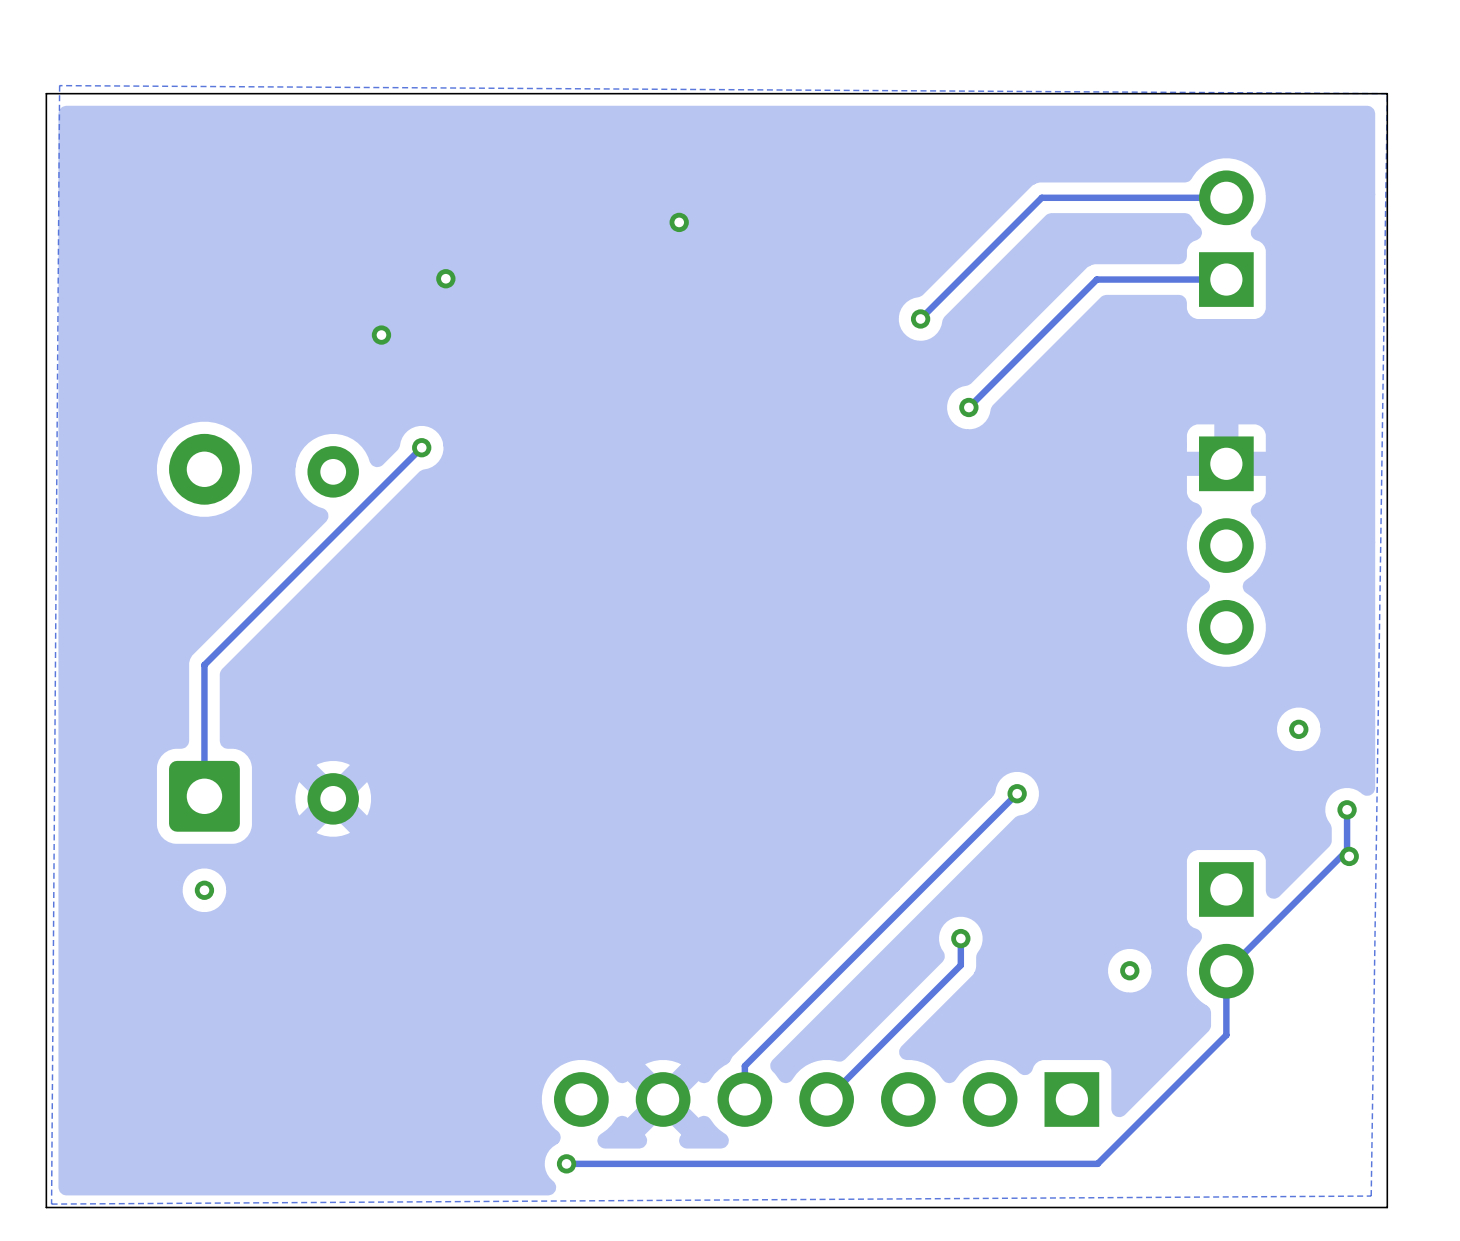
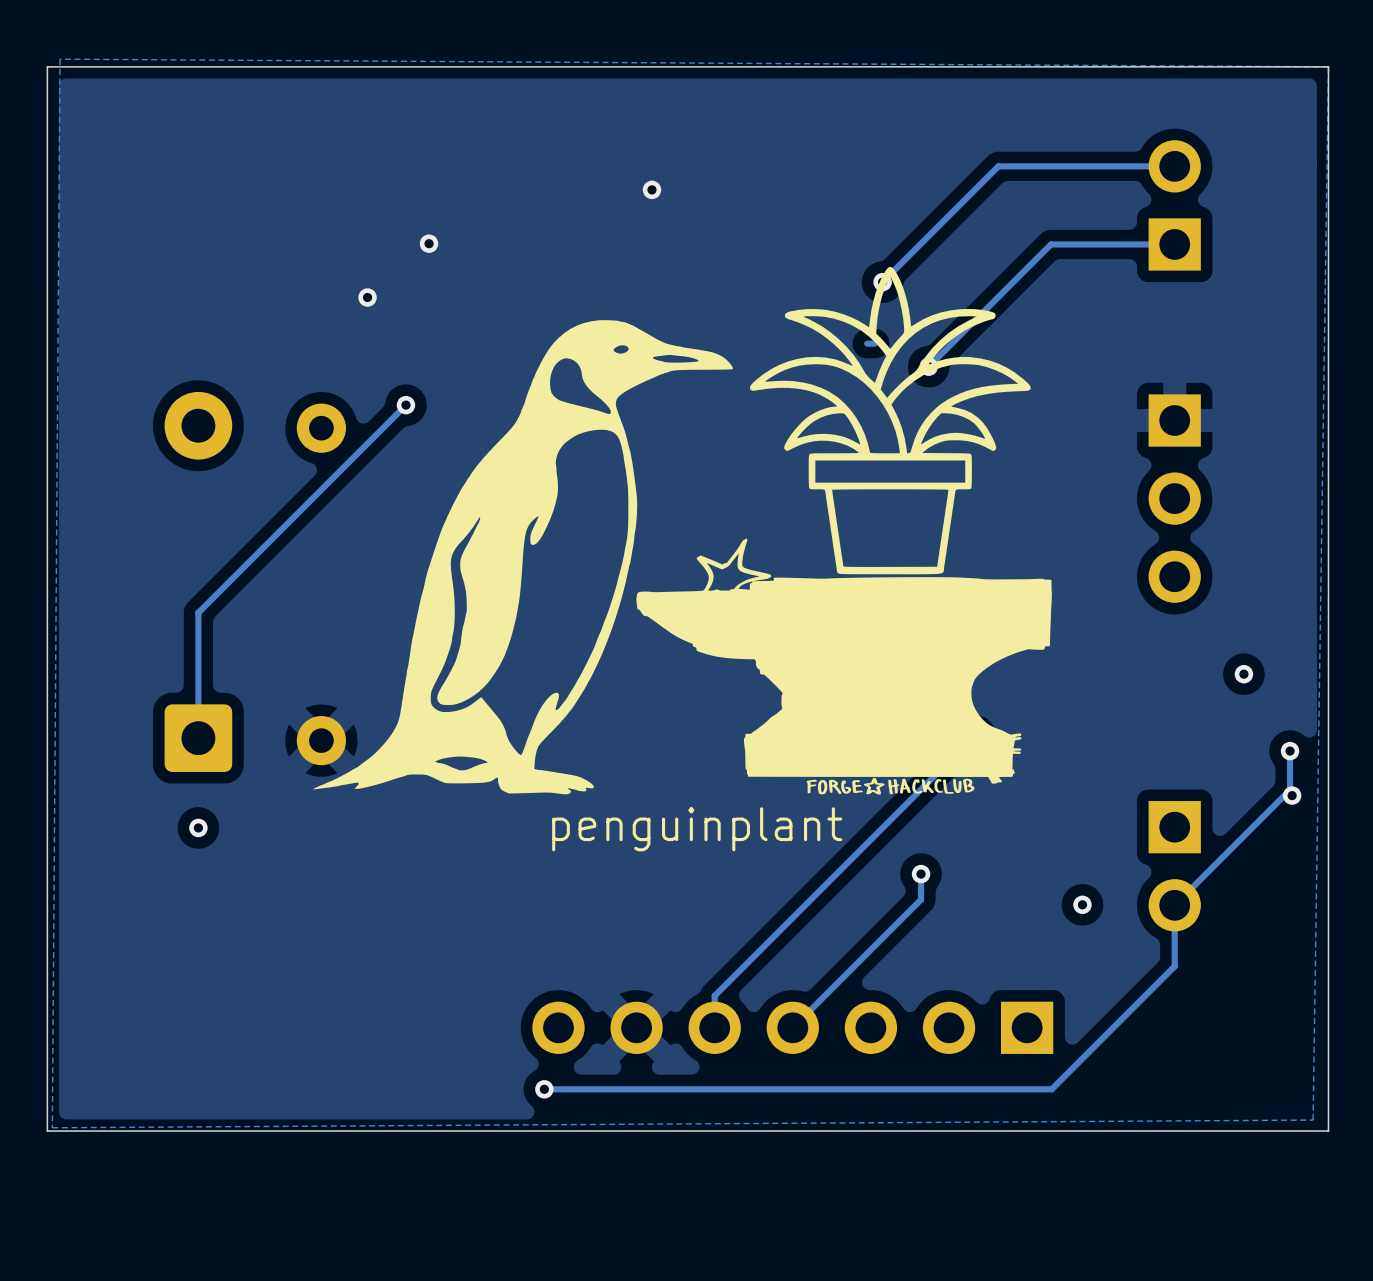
drawing: none -> [313, 266, 1052, 795]
track: none -> (874, 343) (867, 343)
text: none -> penguinplant (697, 829)

